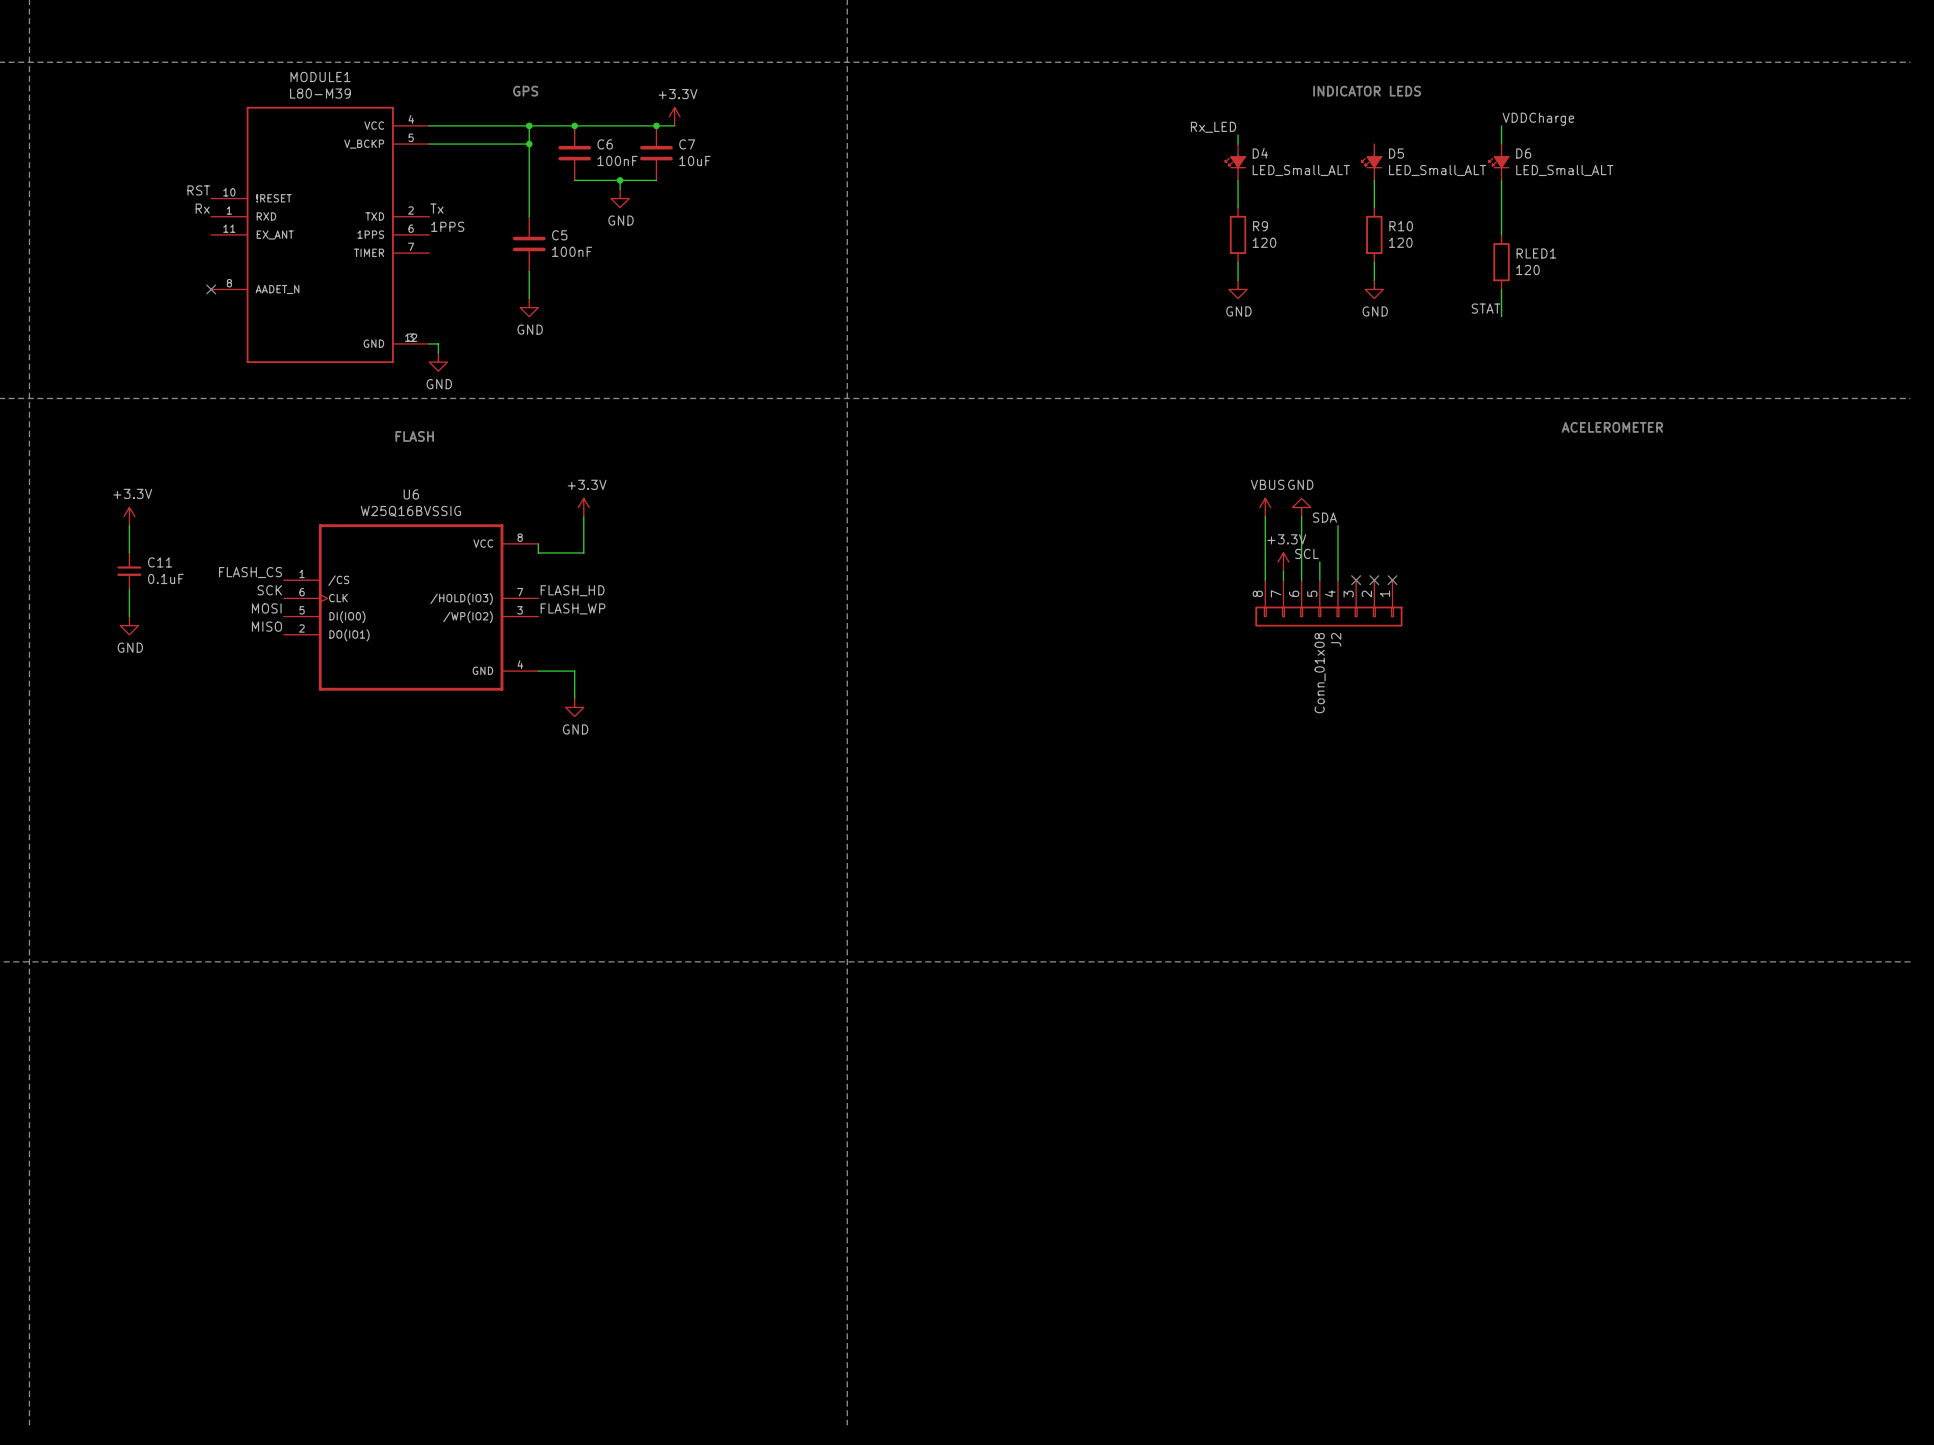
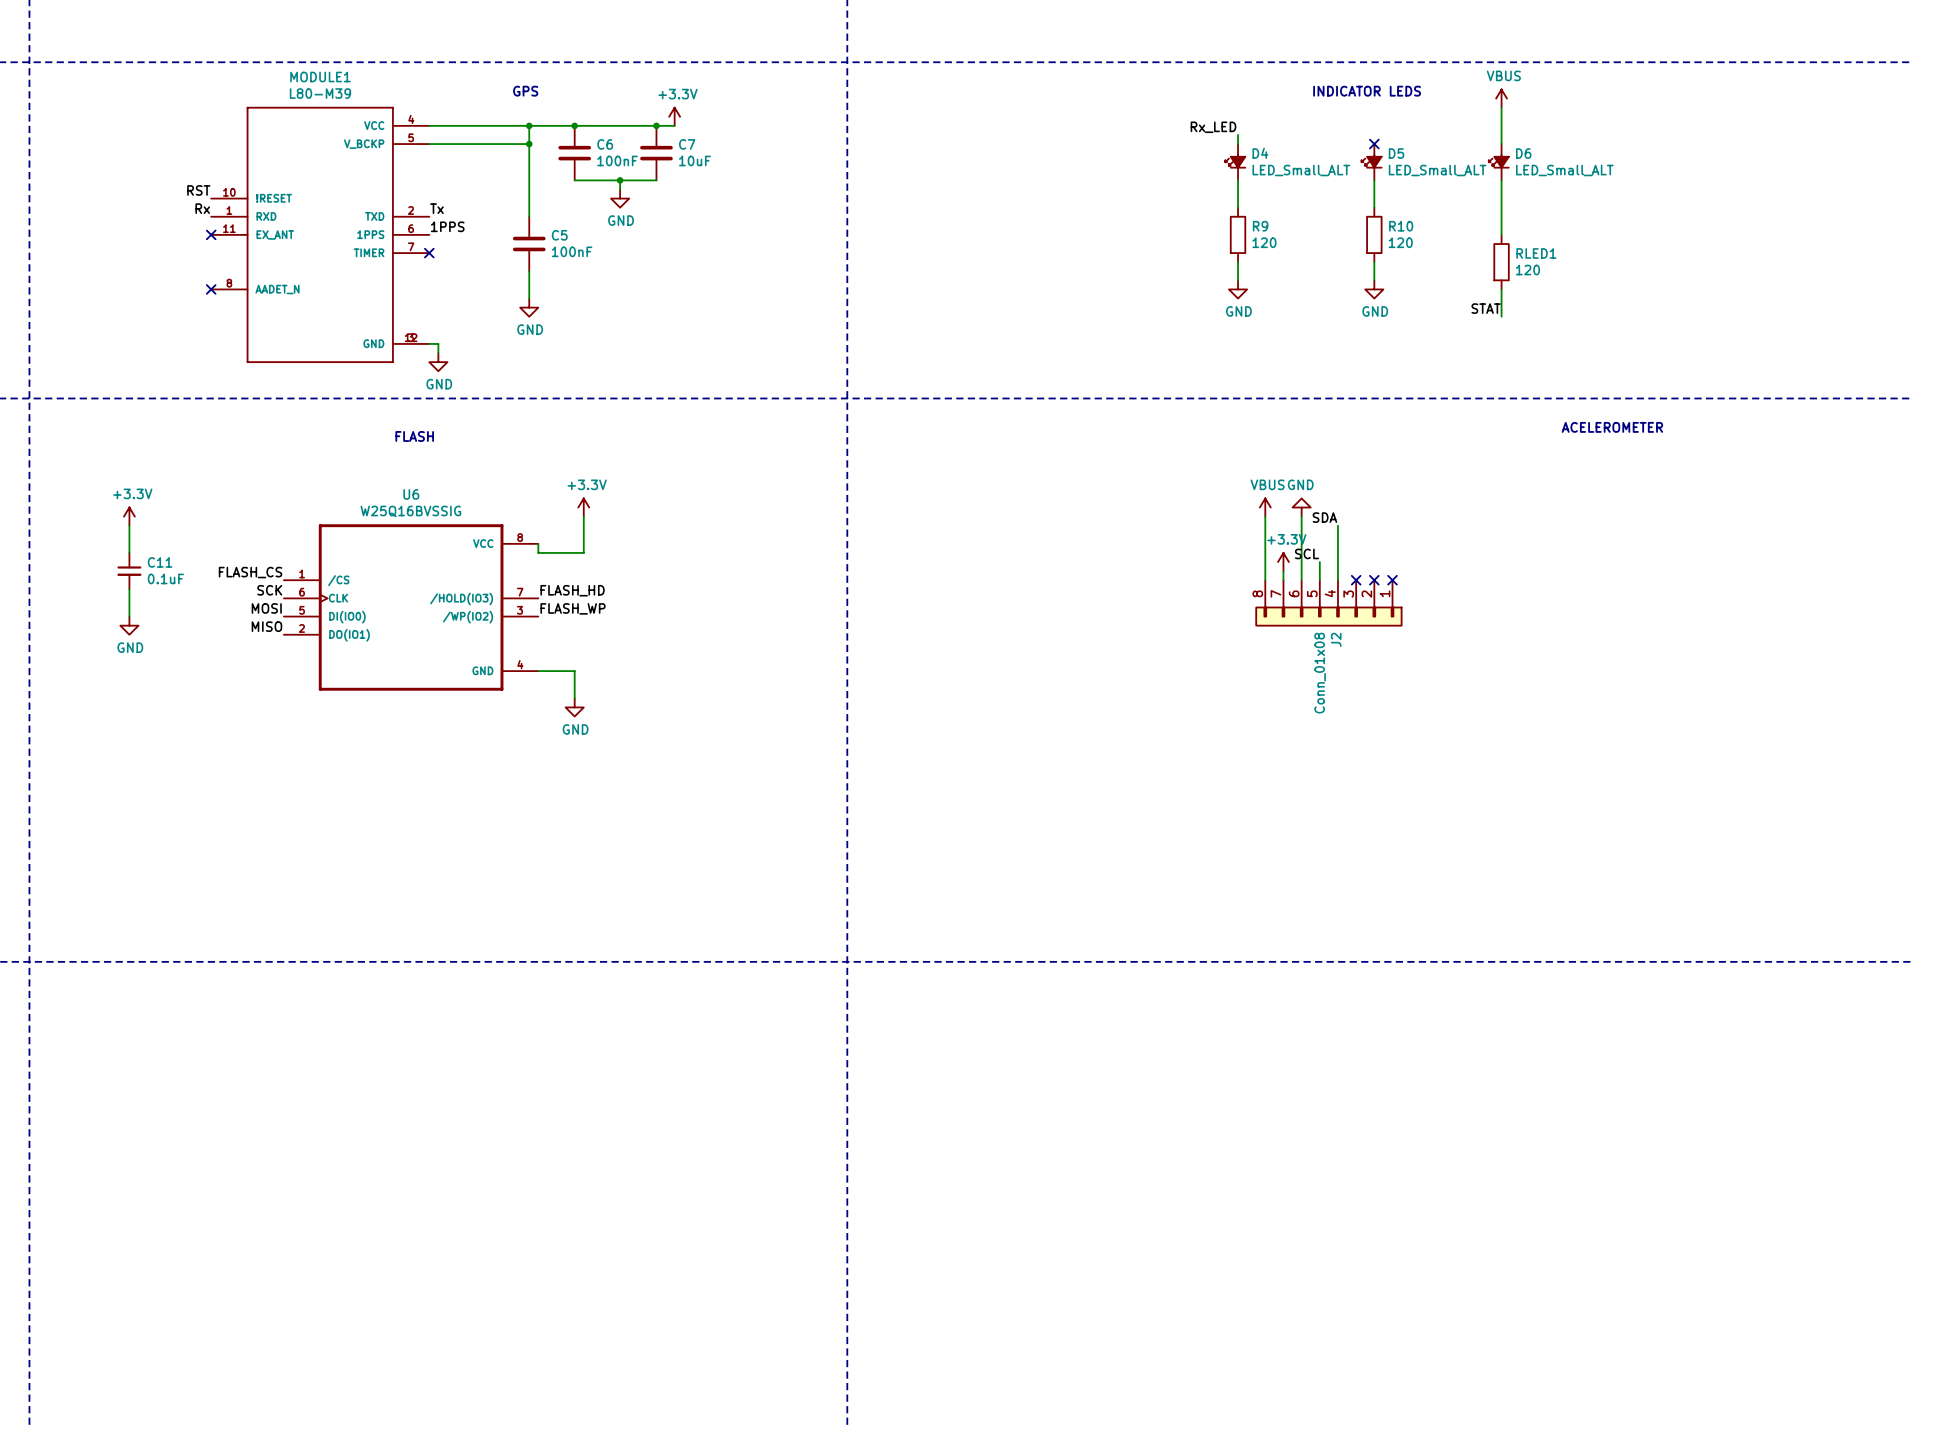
power symbol: none -> VBUS (1501, 98)
wire: none -> (1501, 107) (1501, 125)
label: VDDCharge (1538, 119) -> none
no-connect mark: none -> (1374, 144)
no-connect mark: none -> (211, 234)
no-connect mark: none -> (429, 253)

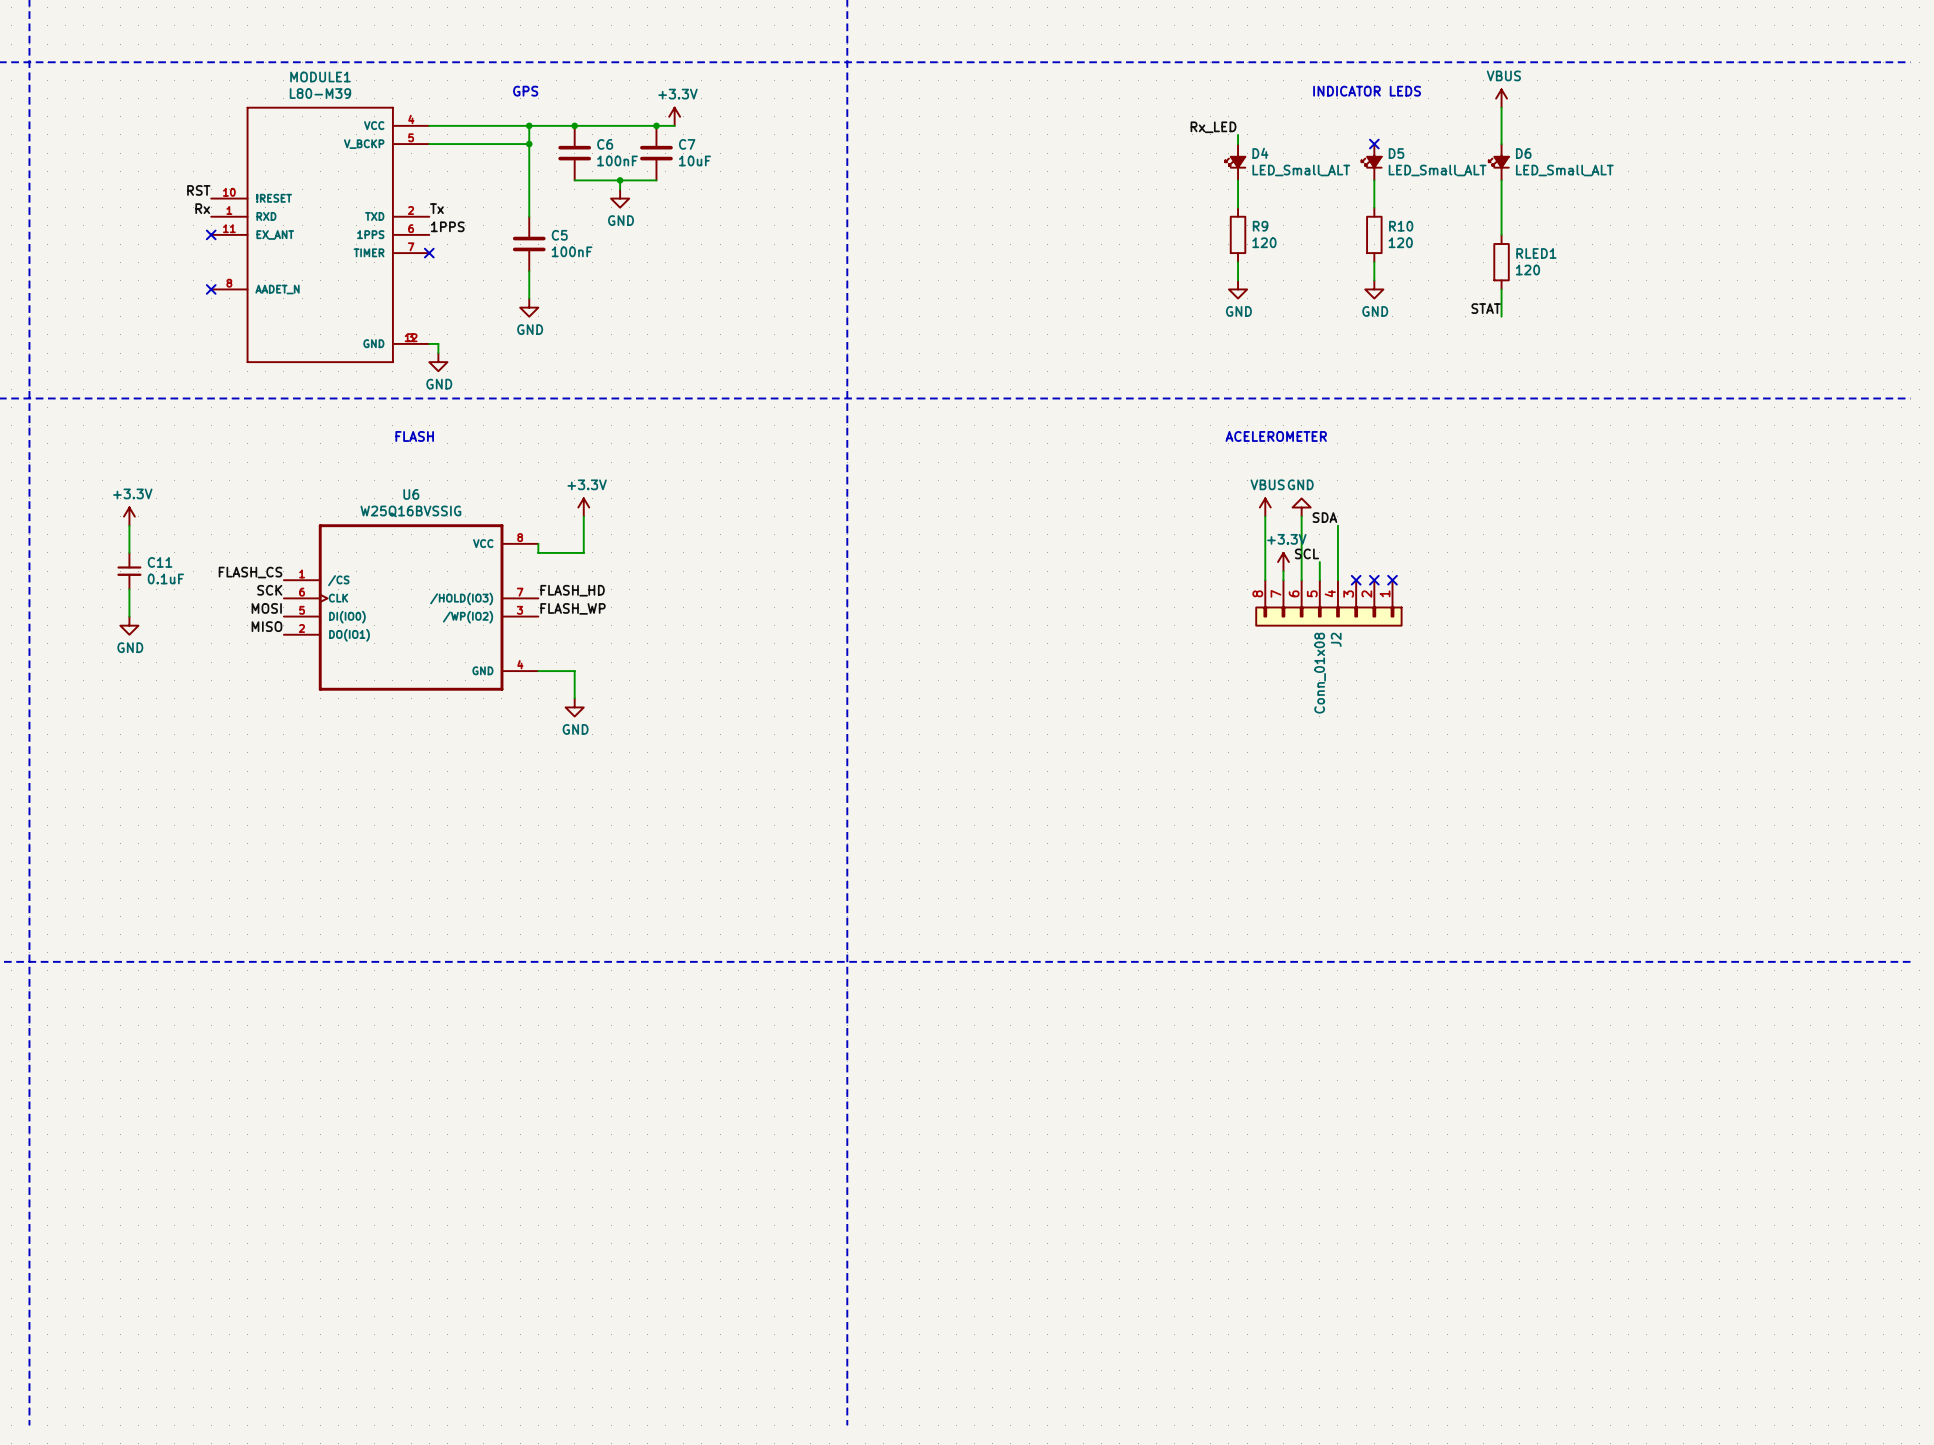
text: ACELEROMETER (1612, 427) -> none
text: none -> ACELEROMETER (1276, 436)

